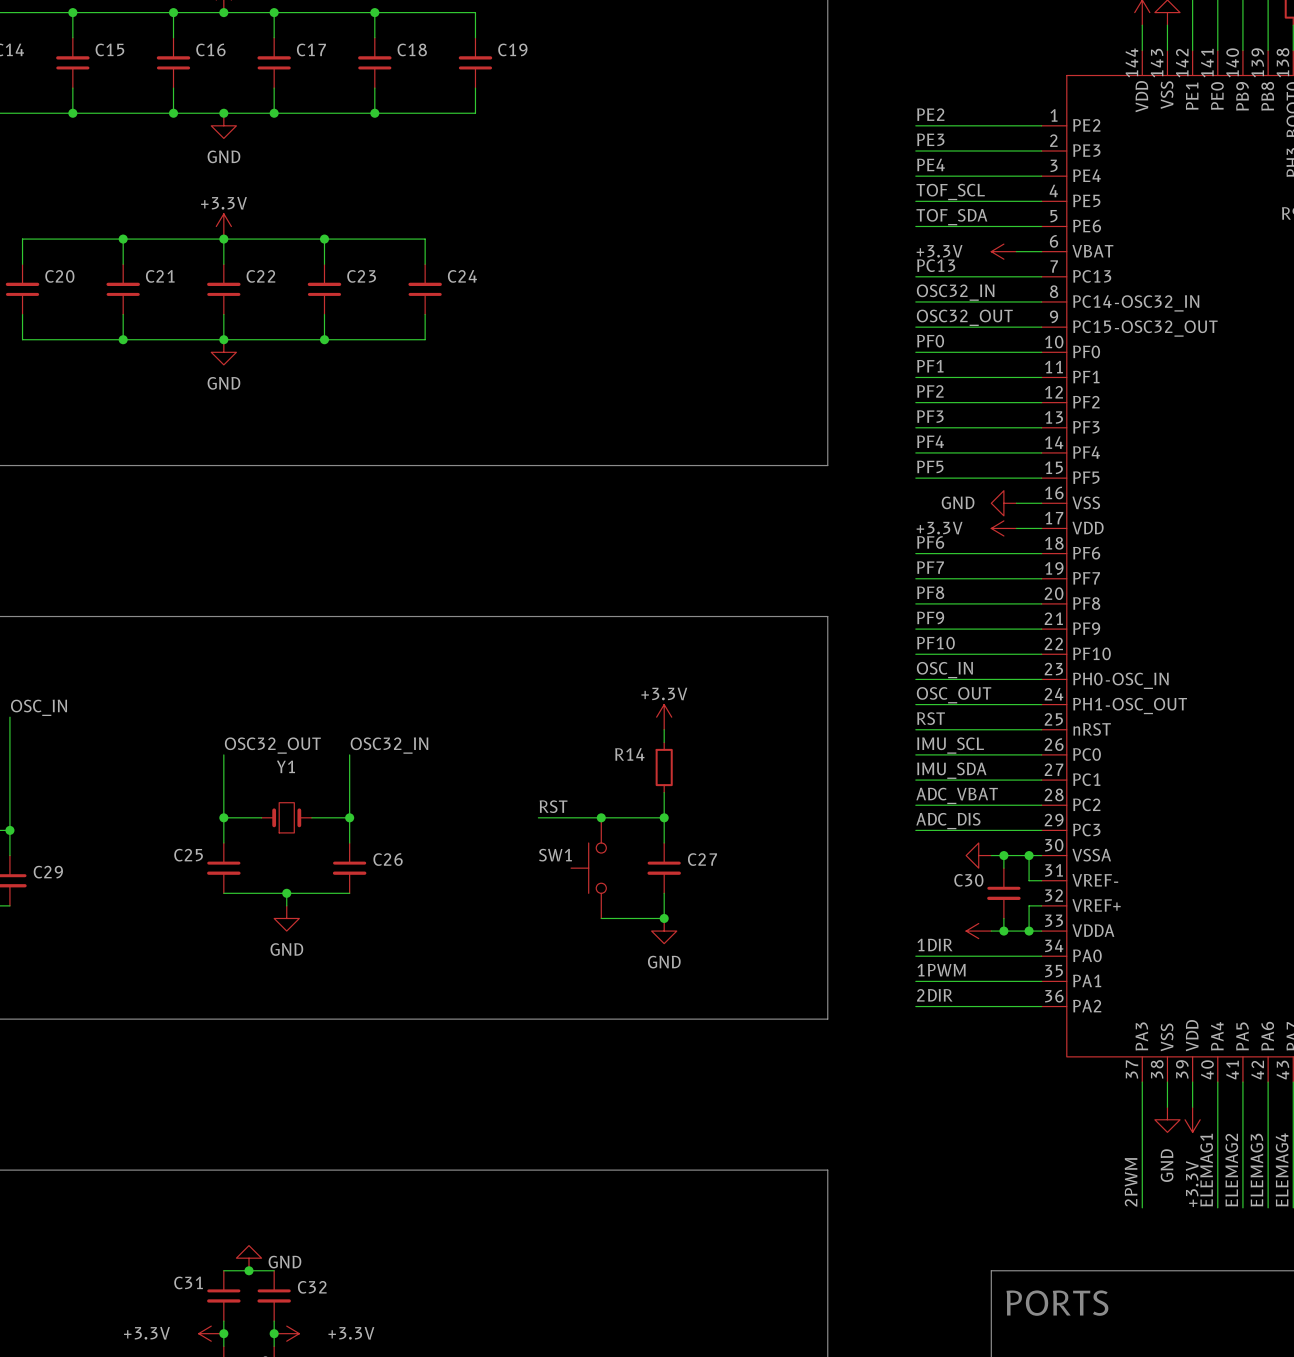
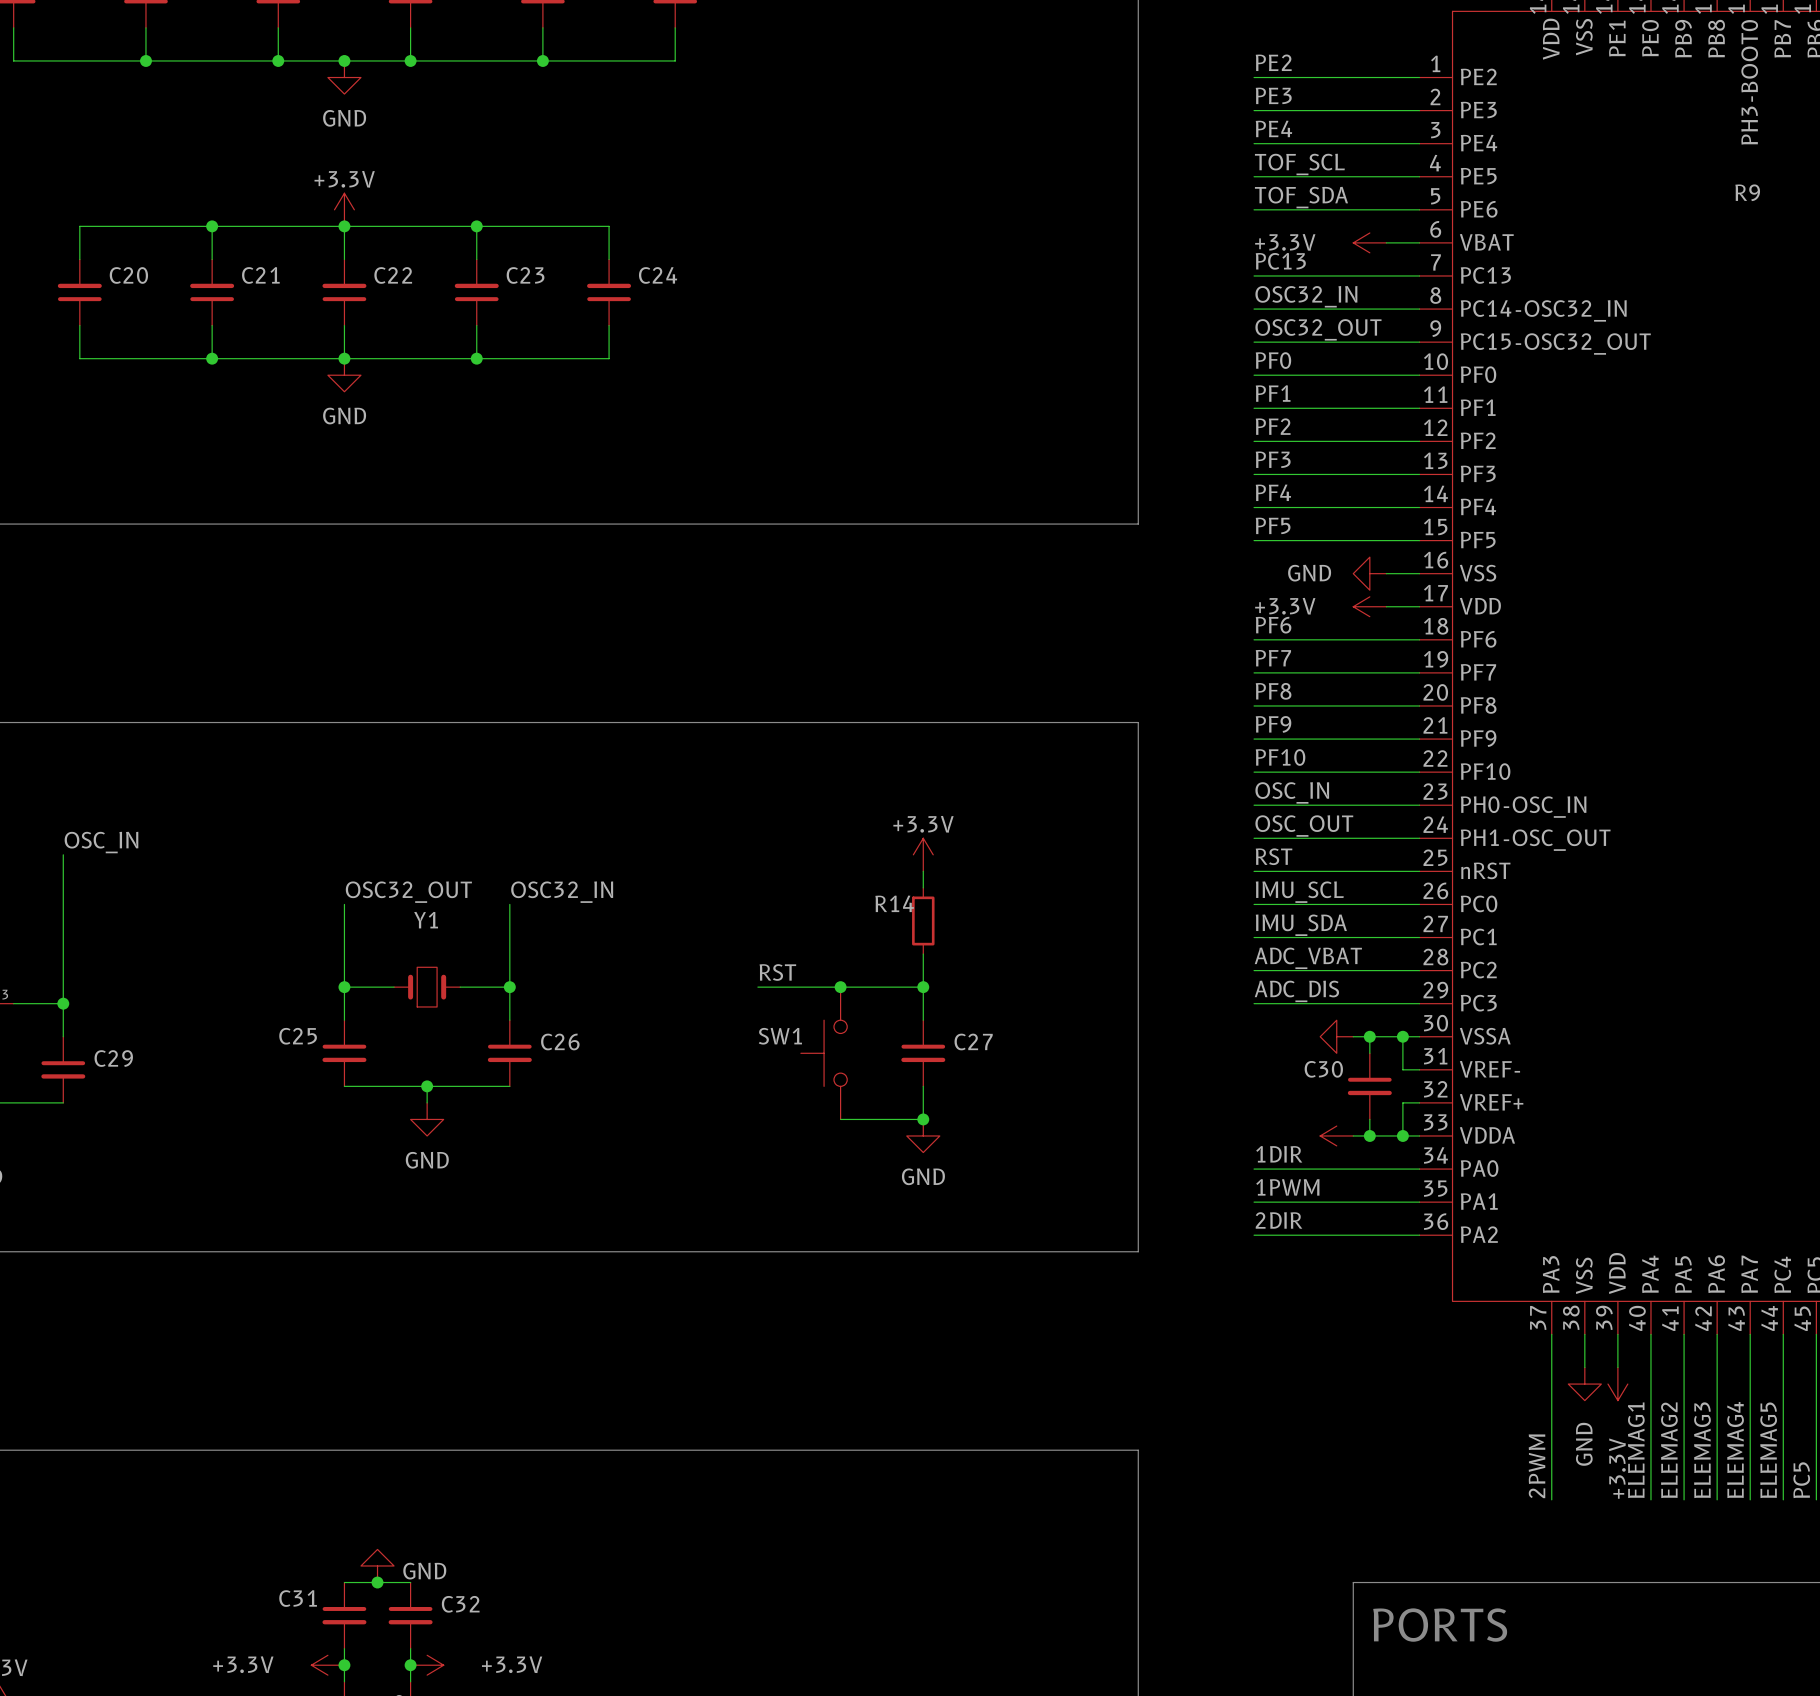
R14 name position: R14 (629, 754) -> R14 (894, 903)

